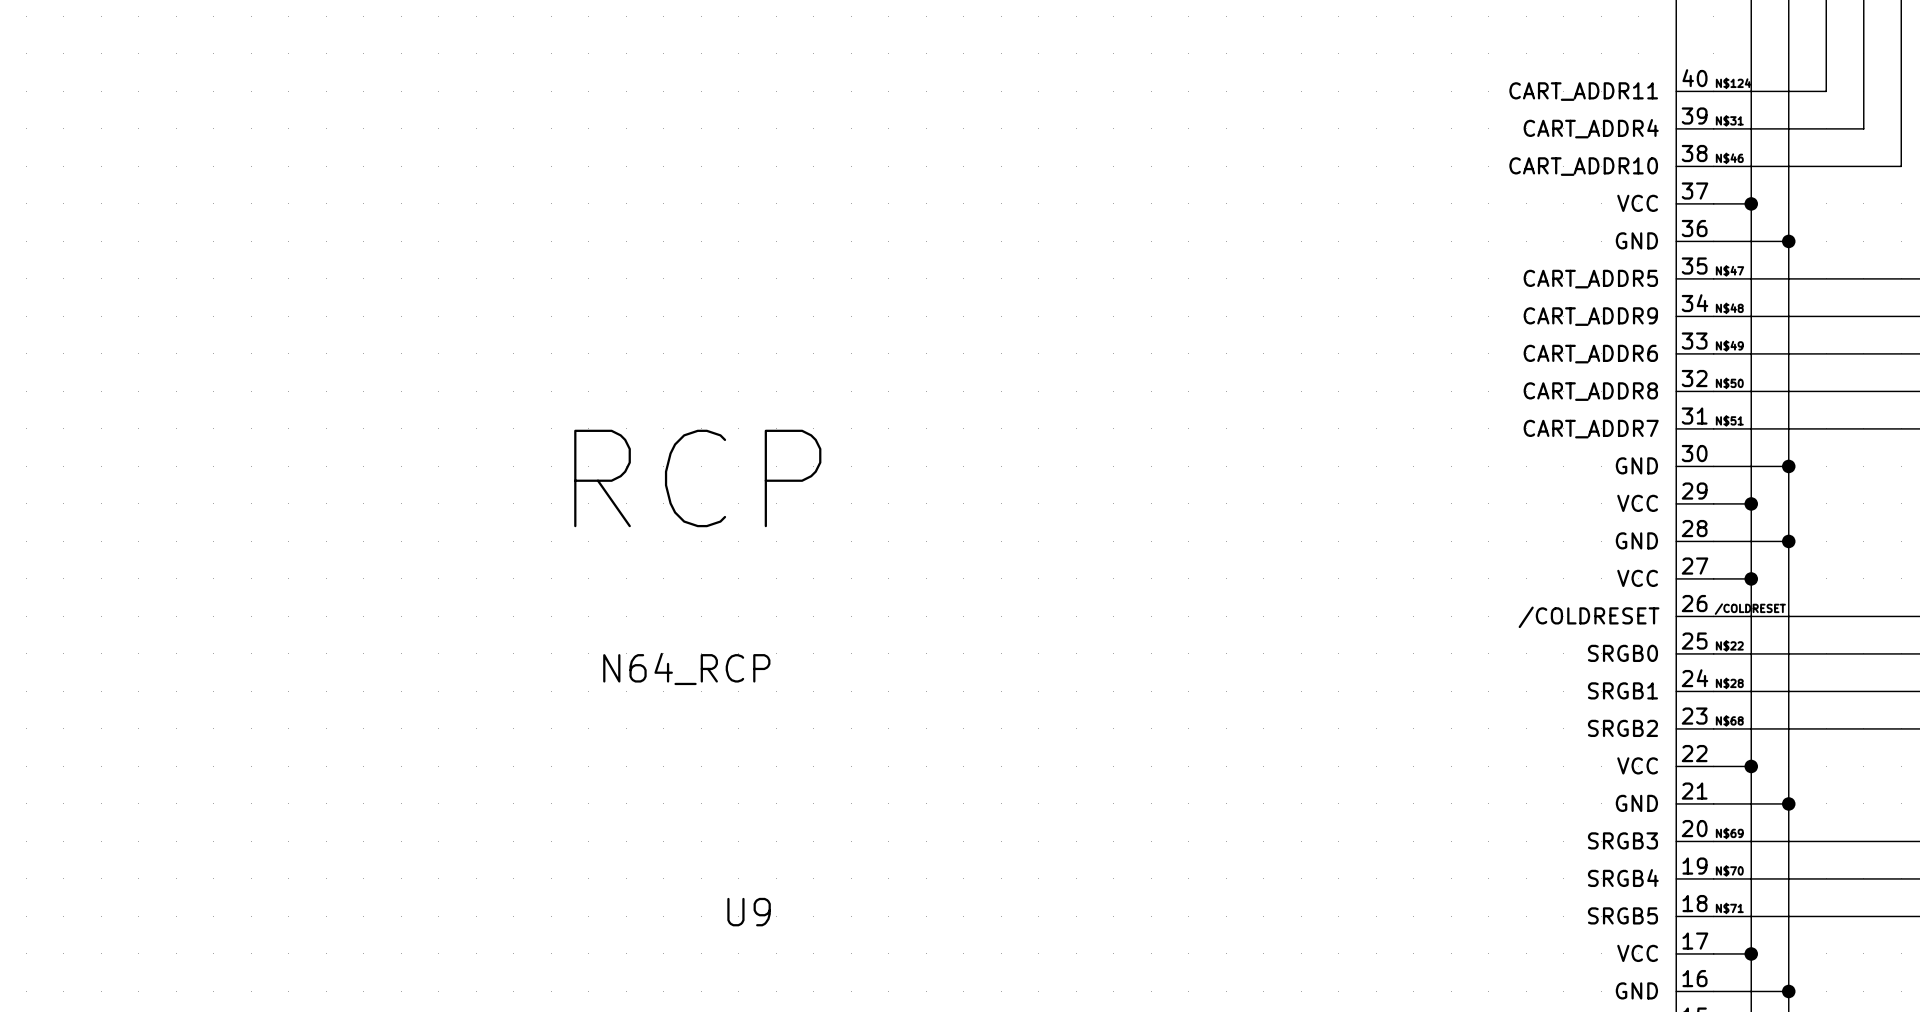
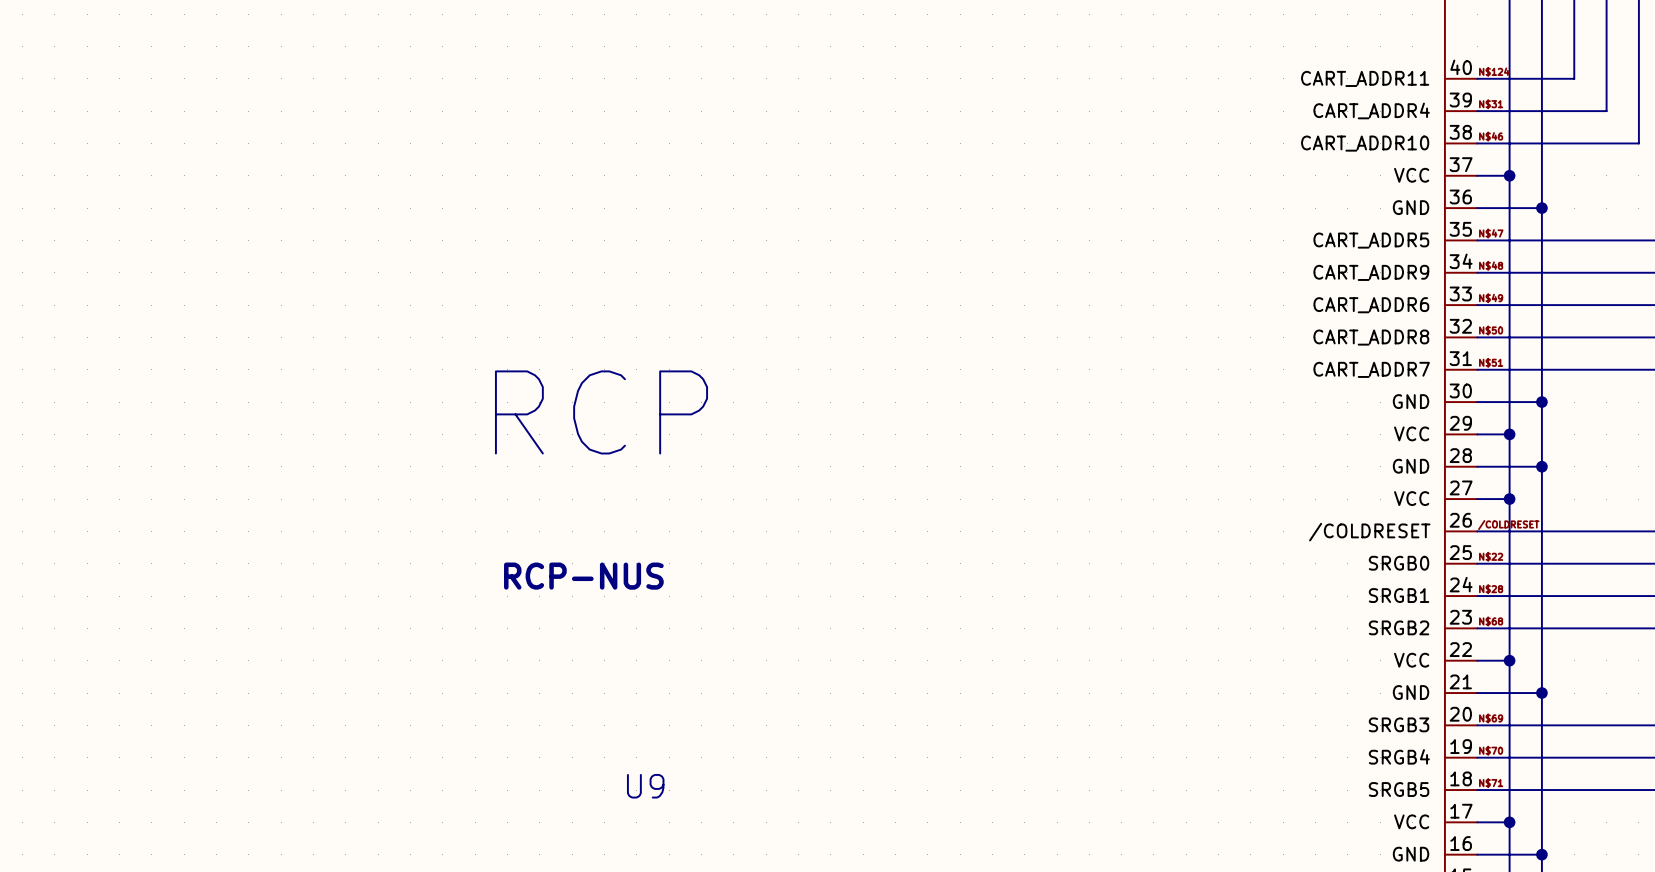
U9 value: N64_RCP (686, 668) -> RCP-NUS (583, 576)

